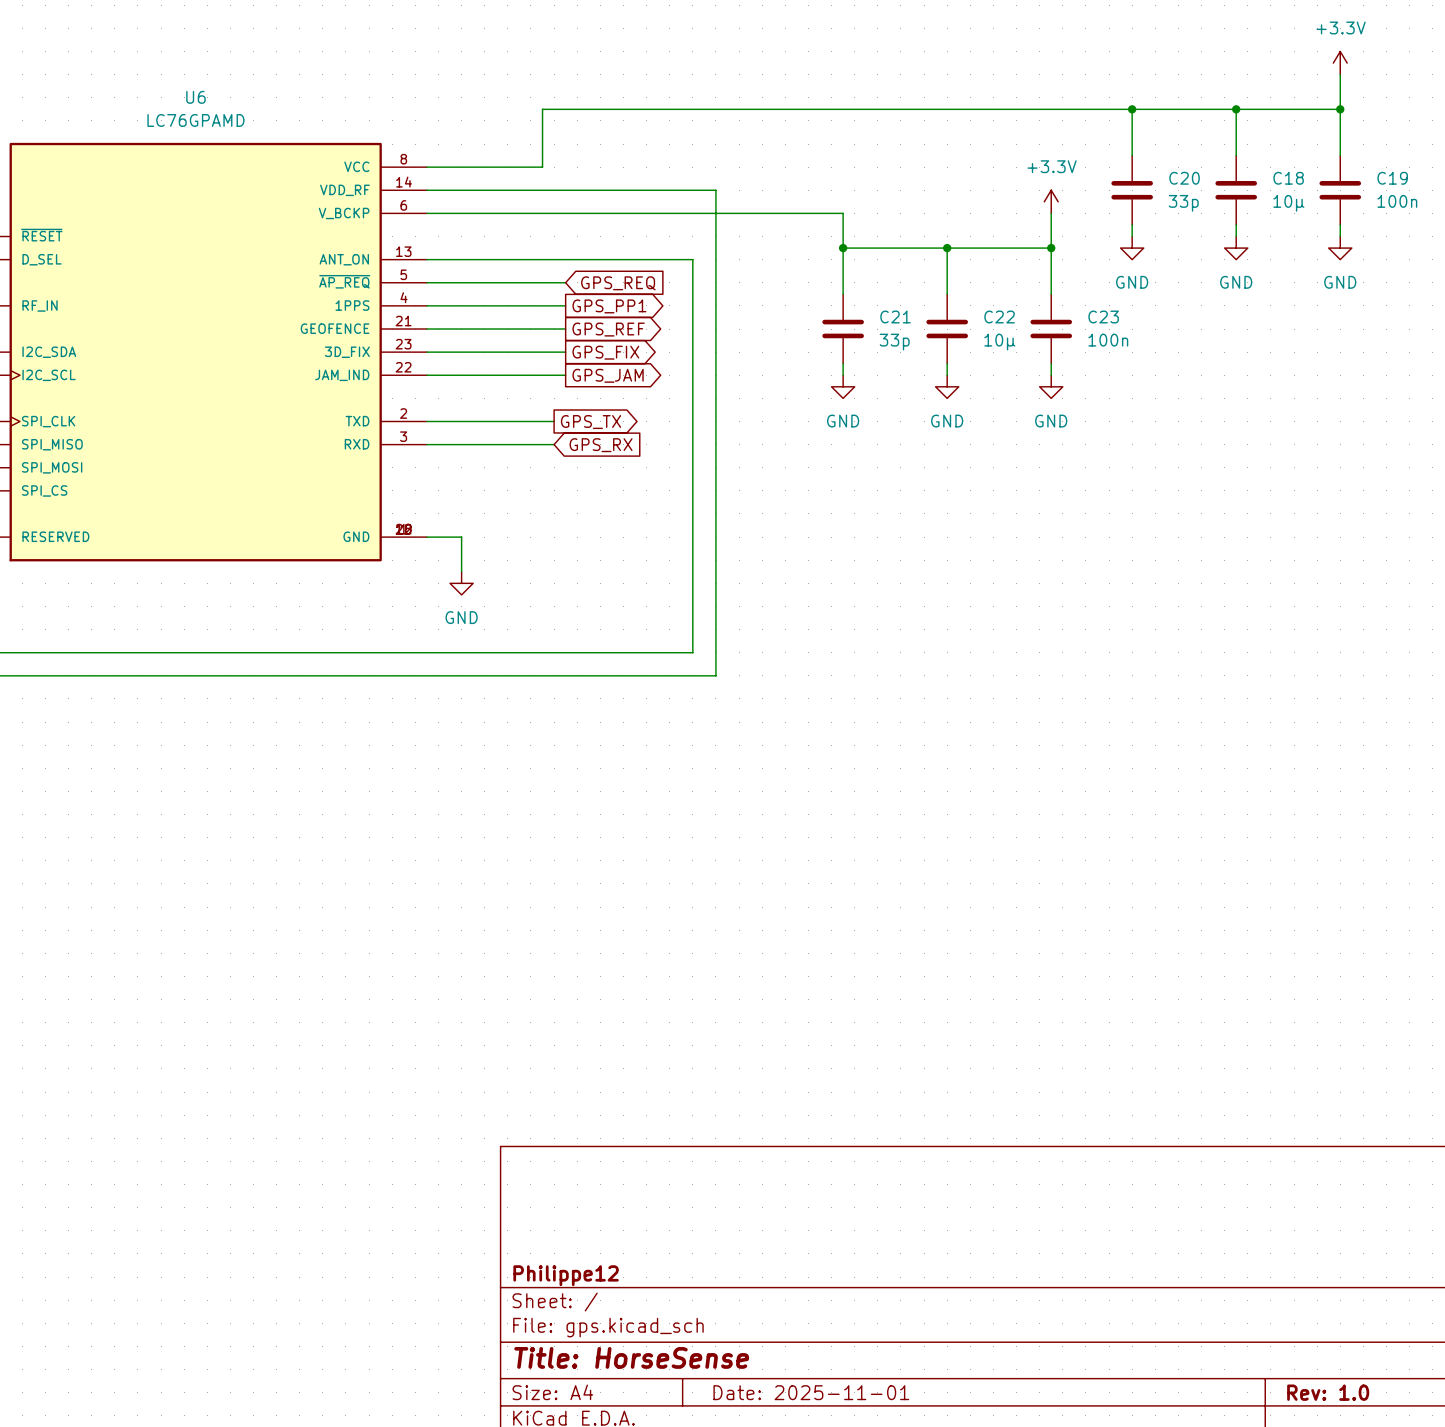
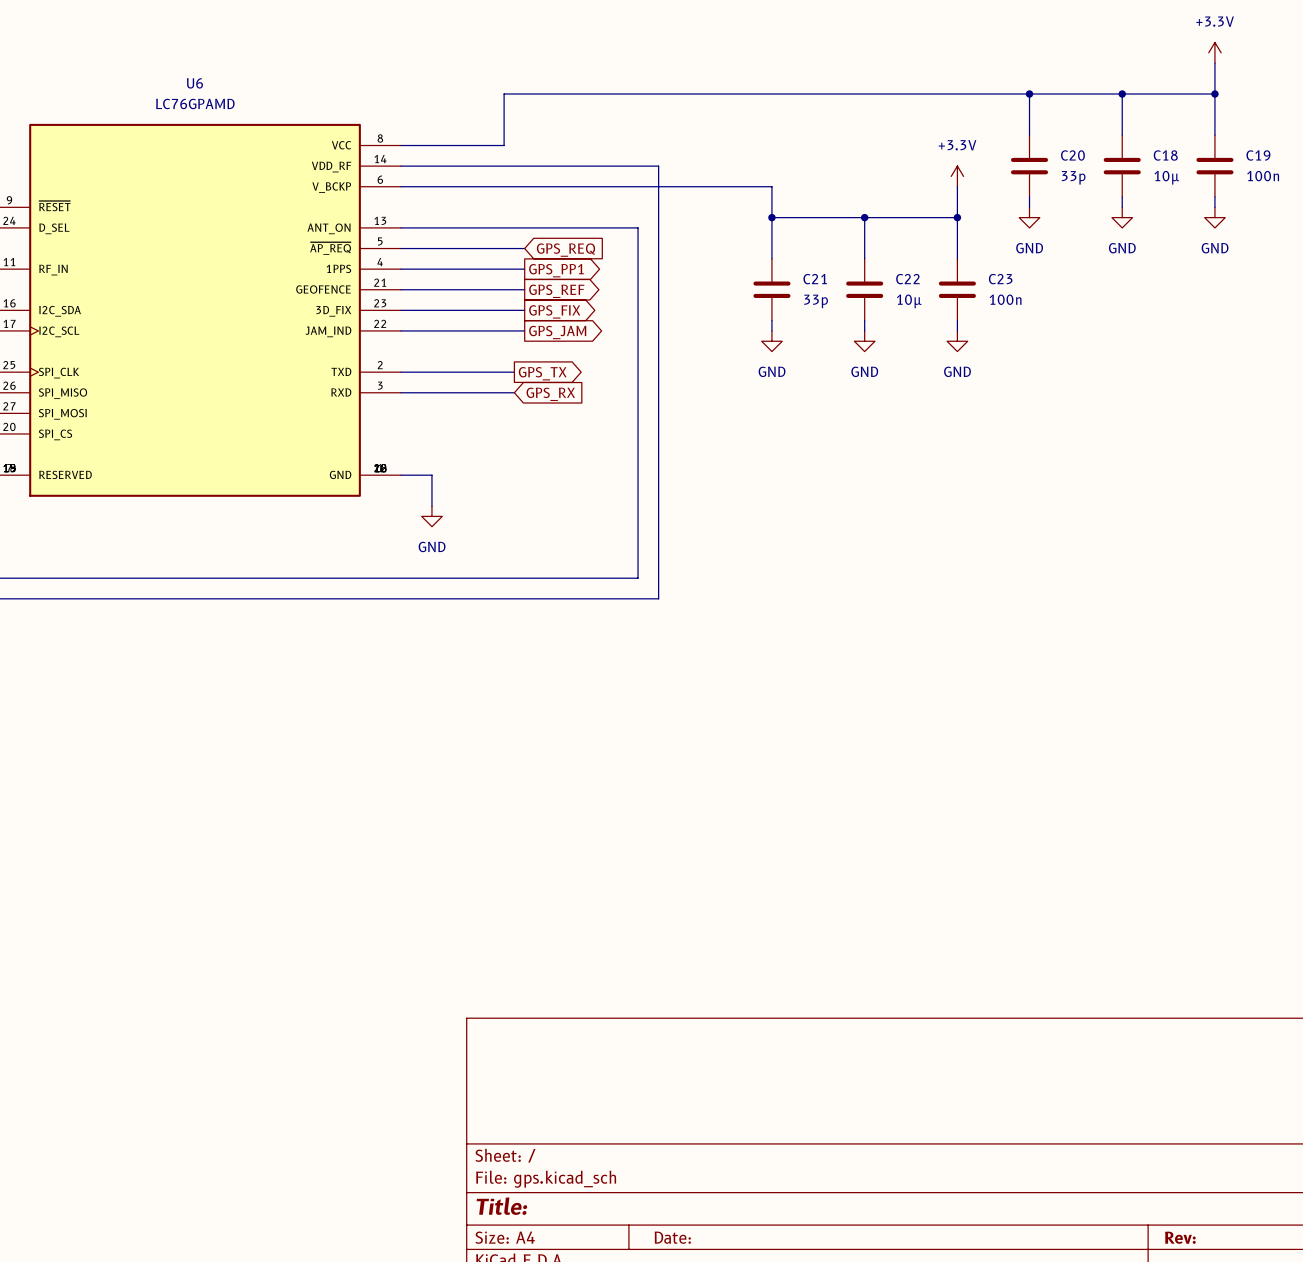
title block: Philippe12 (566, 1275) -> none
title block: Title: HorseSense (631, 1357) -> Title: (501, 1206)
title block: Date: 2025-11-01 (811, 1392) -> Date: (672, 1237)
title block: Rev: 1.0 (1328, 1392) -> Rev: (1180, 1237)

